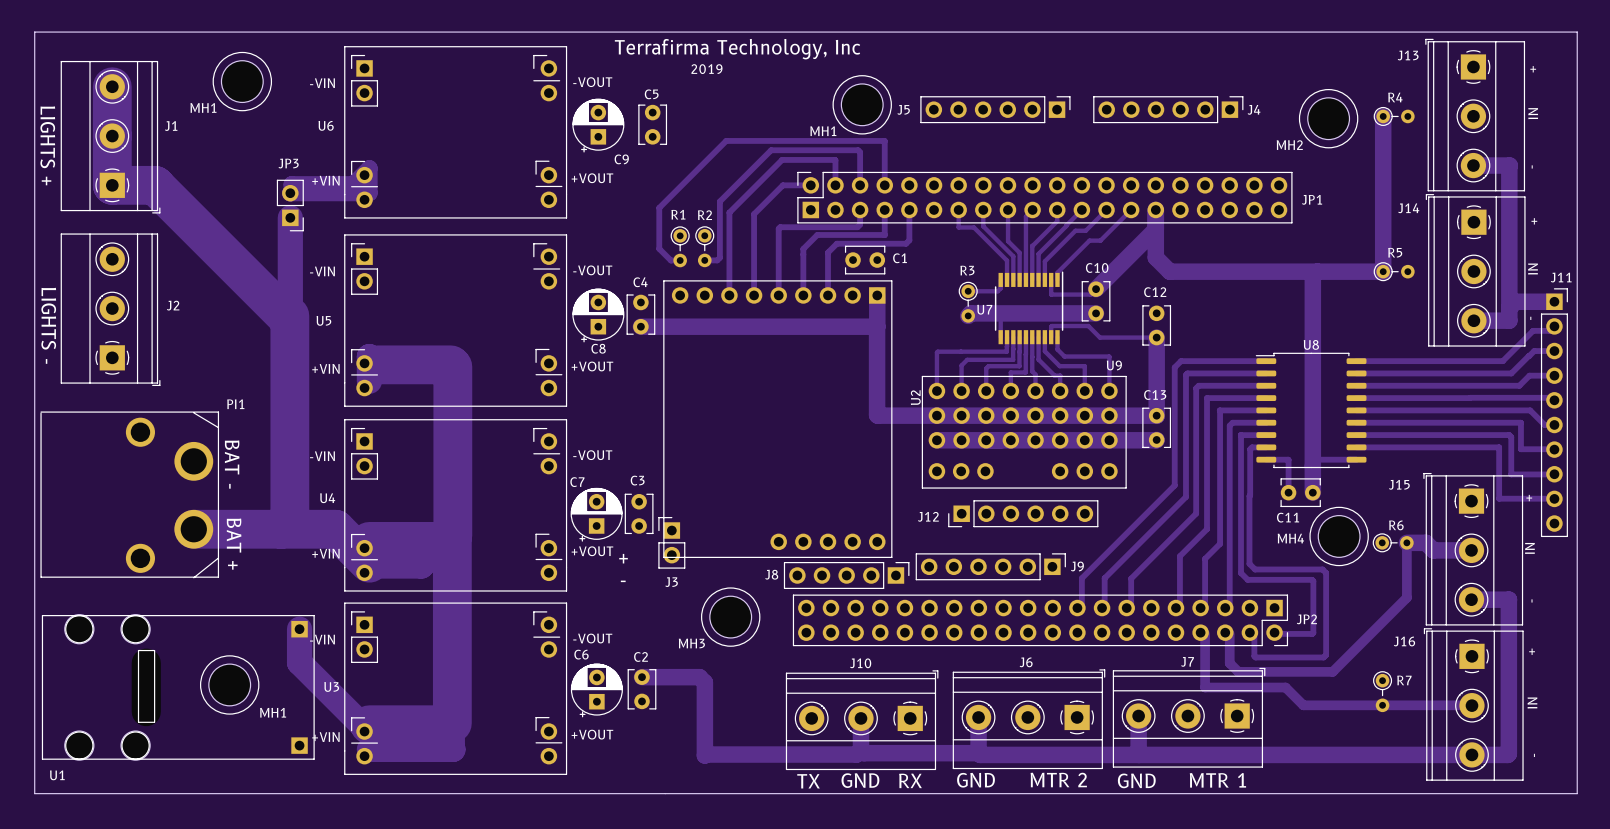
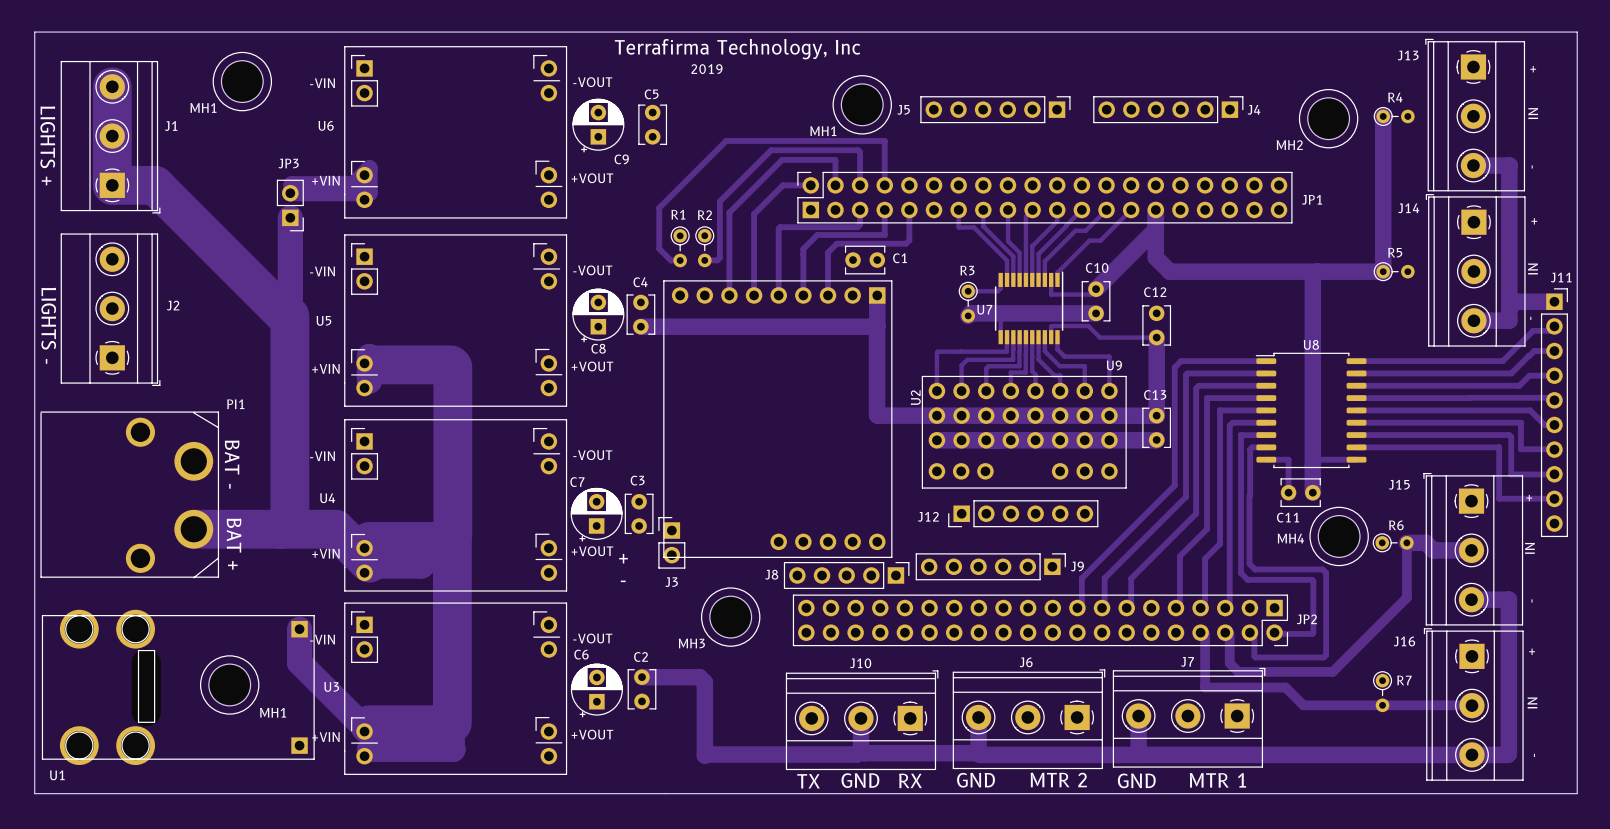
U1 footprint: [41, 614, 315, 761] -> [41, 609, 315, 766]

